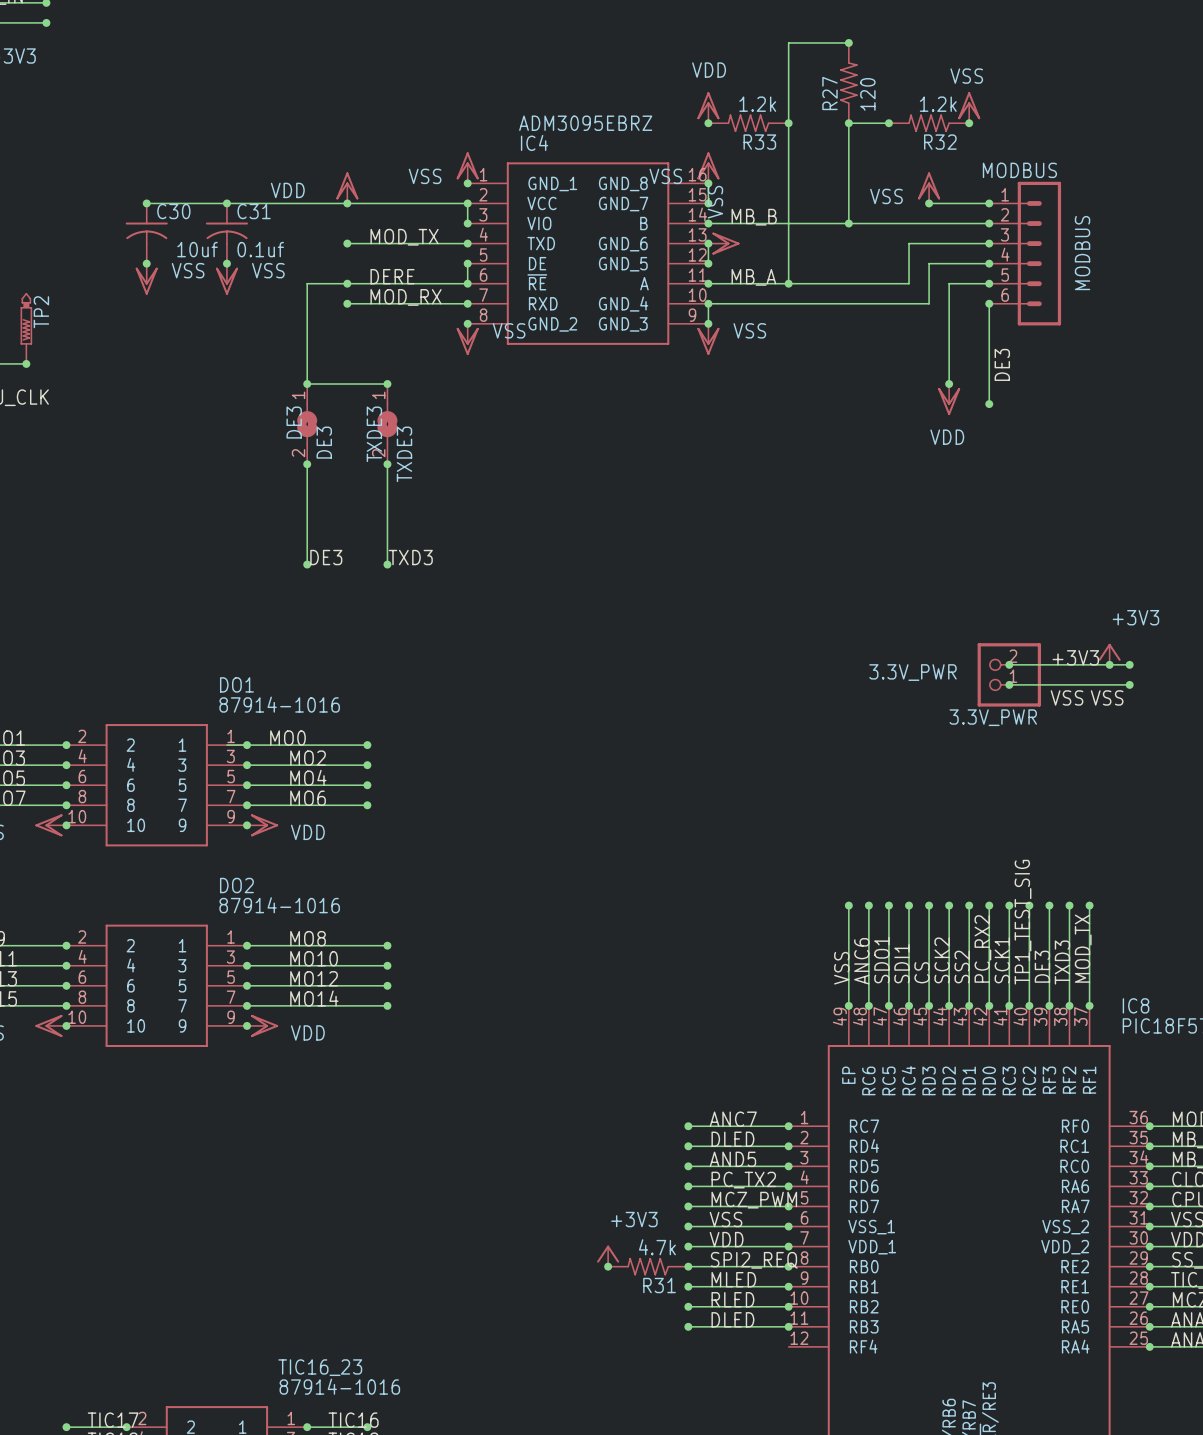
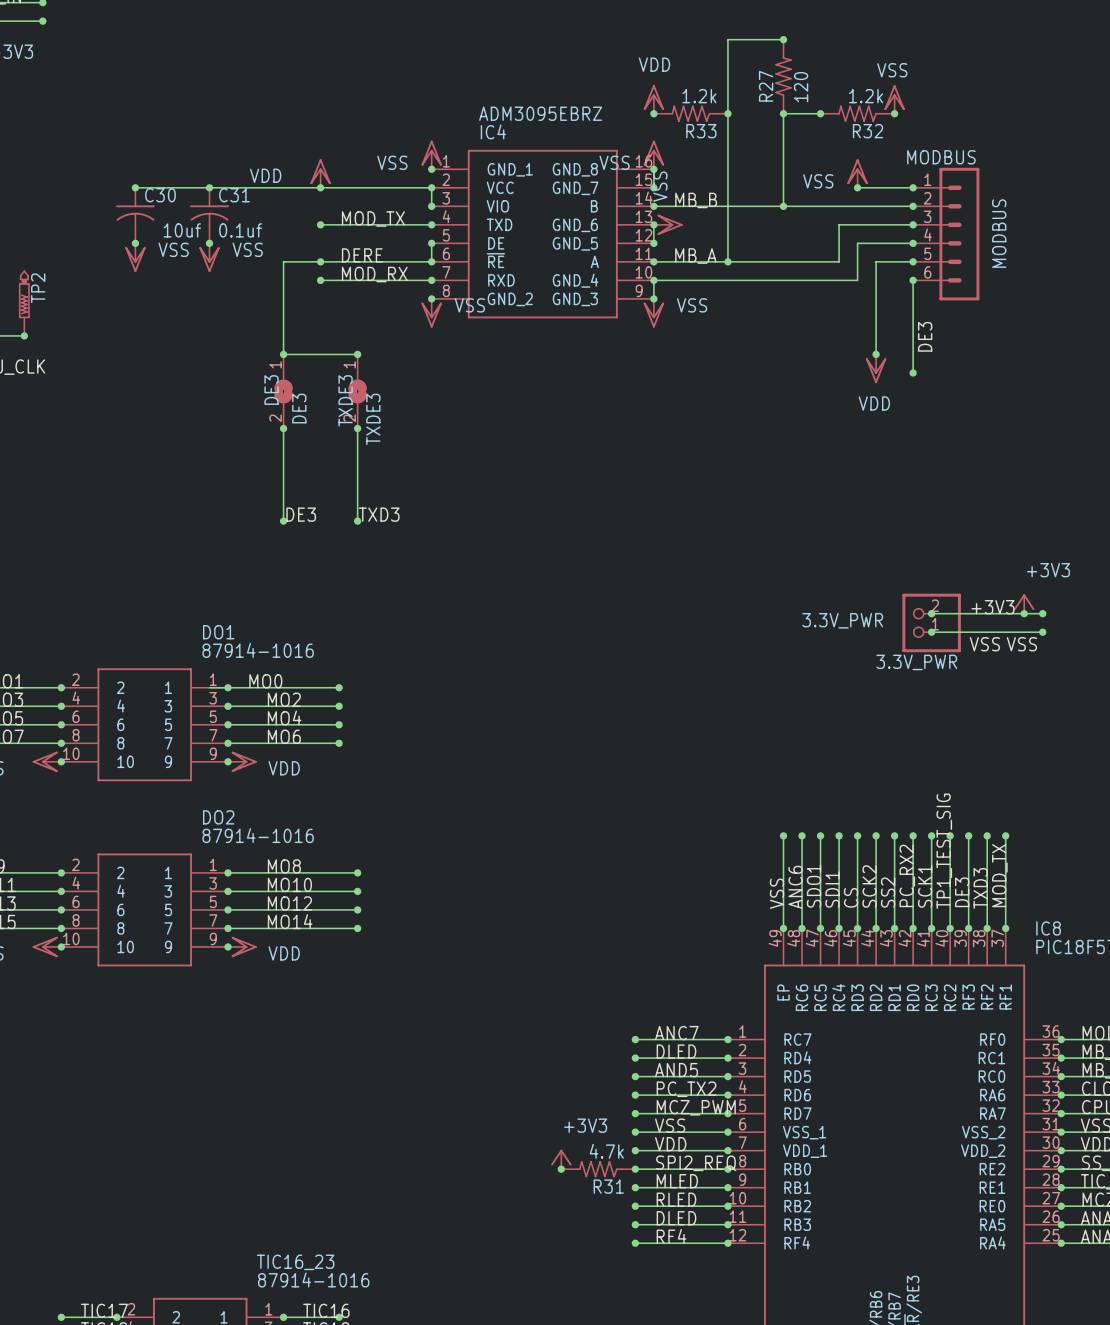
label: none -> RF4 (671, 1236)
wire: none -> (635, 1243) (727, 1243)
junction: none -> (635, 1243)
junction: none -> (727, 1243)

